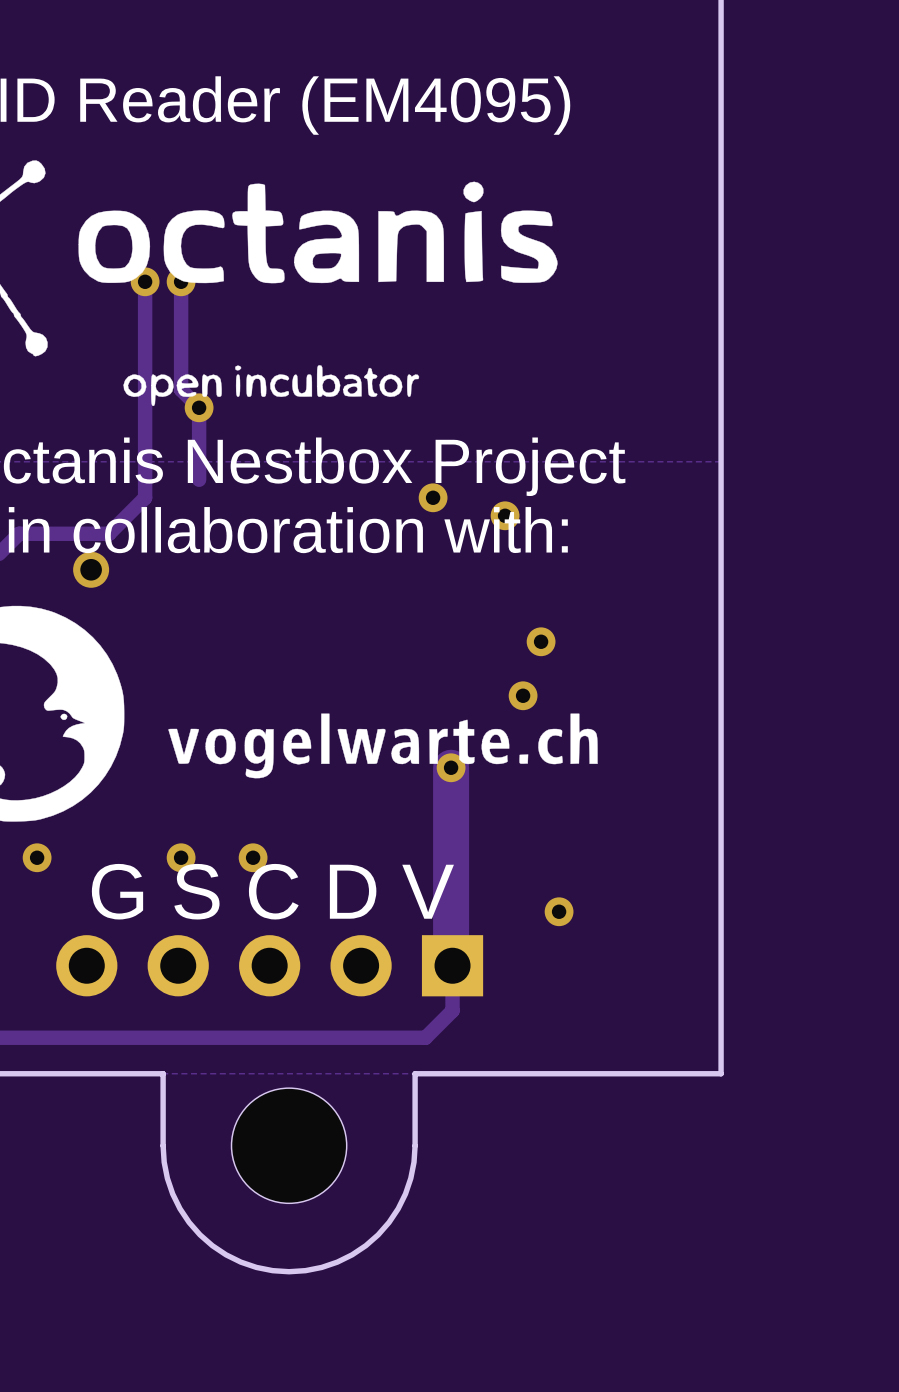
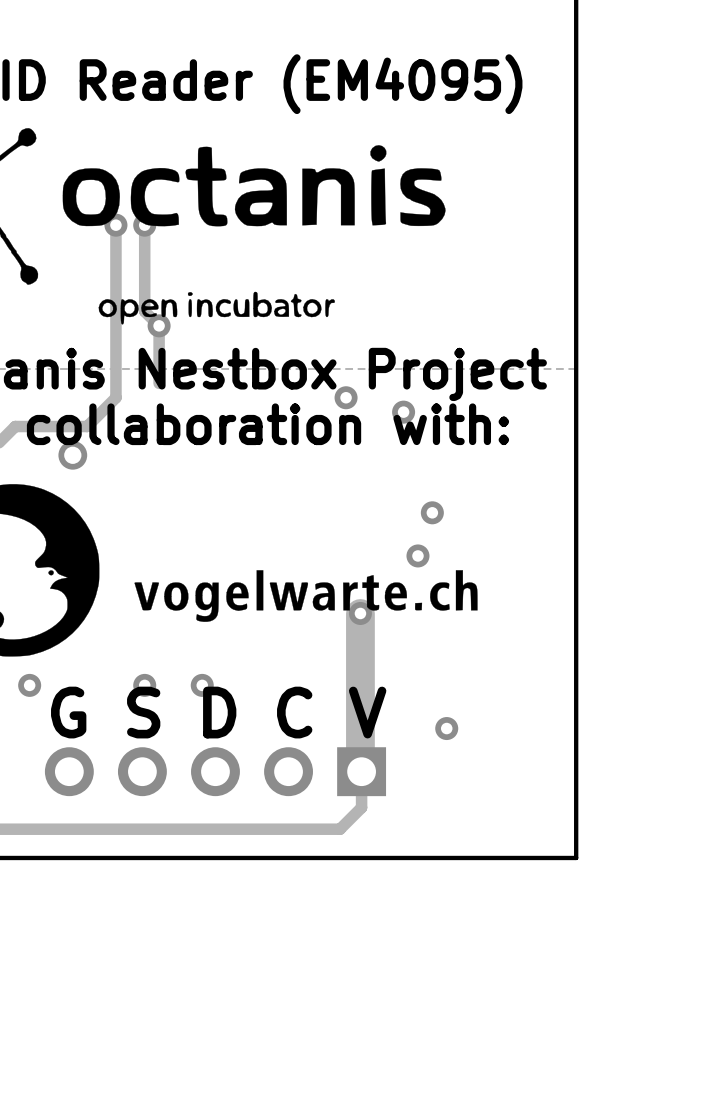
text: G S C D V (272, 891) -> G S D C V (218, 712)
board edge: (415, 1073) (414, 1162) (410, 1178) (398, 1208) (378, 1234) (352, 1254) (321, 1267) (289, 1271) (256, 1267) (226, 1254) (200, 1234) (179, 1208) (167, 1178) (164, 1162) (163, 1073) -> (331, 857) (130, 857)
part: (289, 1145) -> none

